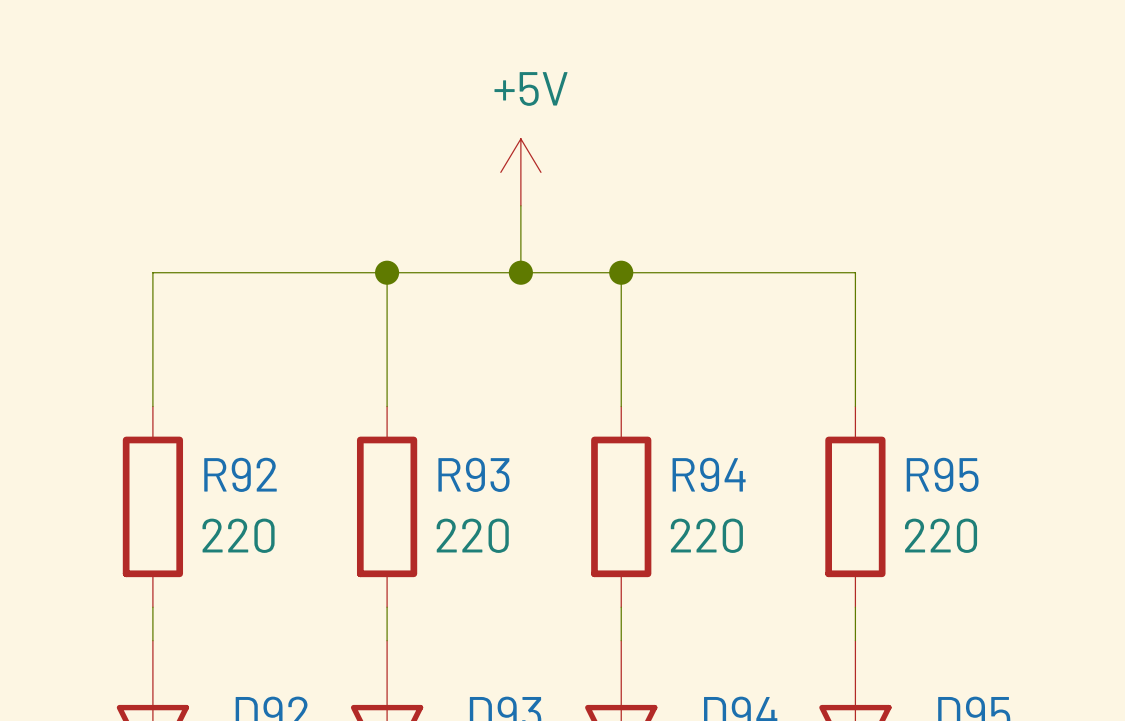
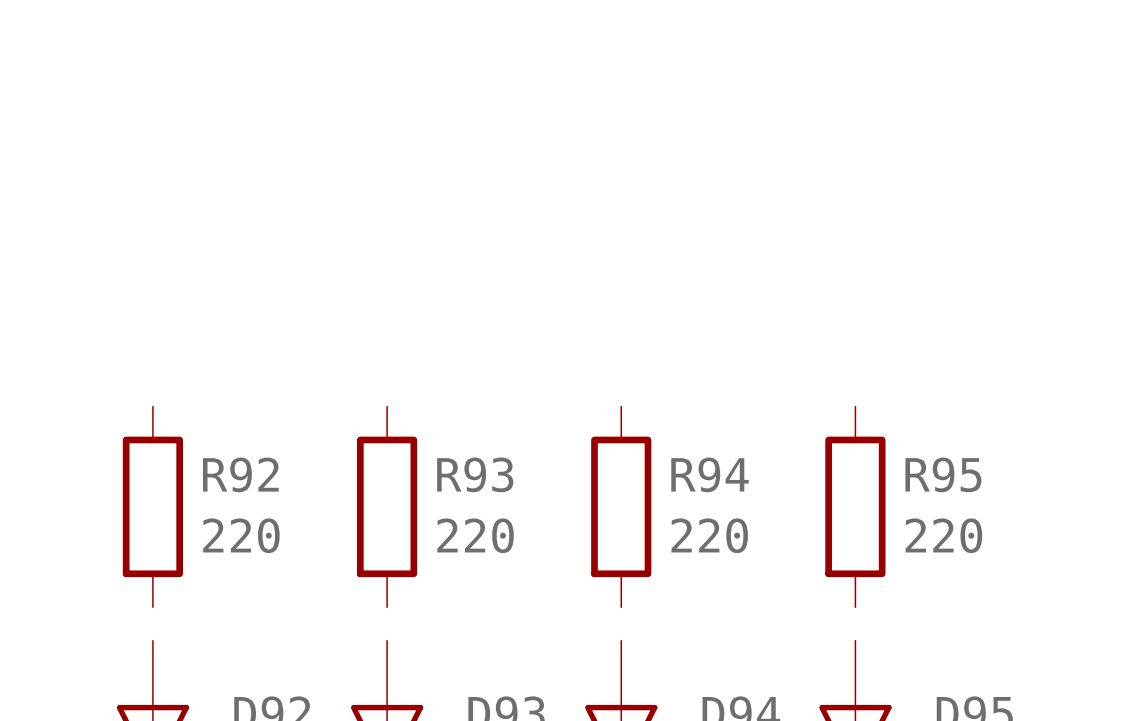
power symbol: +5V (520, 172) -> none
wire: (520, 205) (520, 272) -> none
wire: (387, 272) (387, 406) -> none
junction: (387, 272) -> none
junction: (520, 272) -> none
wire: (621, 272) (621, 406) -> none
junction: (621, 272) -> none
wire: (152, 406) (152, 272) (855, 272) (855, 406) -> none
wire: (152, 607) (152, 640) -> none
wire: (387, 607) (387, 640) -> none
wire: (621, 607) (621, 640) -> none
wire: (855, 607) (855, 640) -> none

